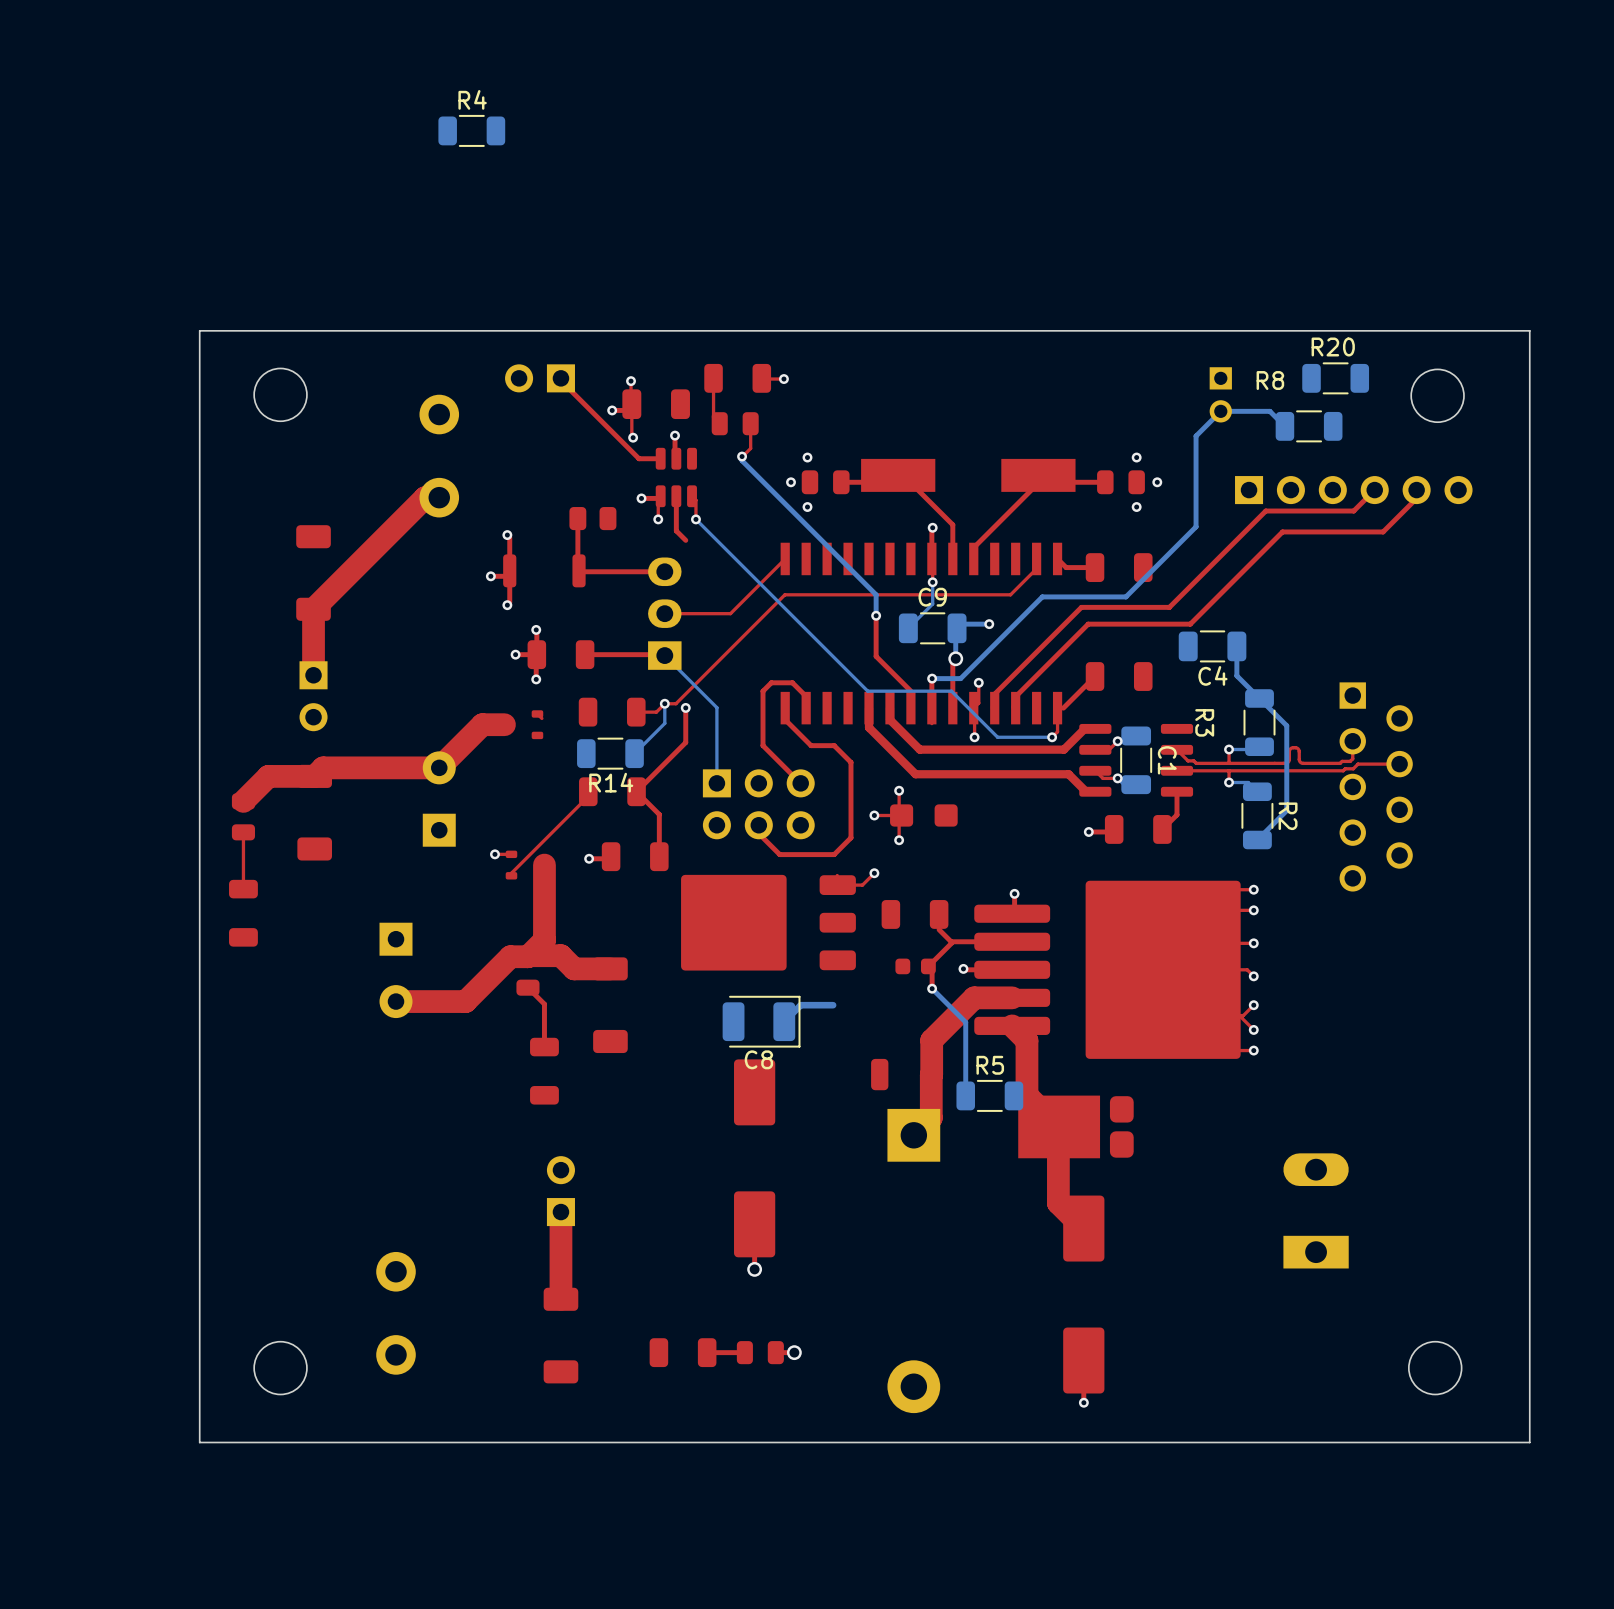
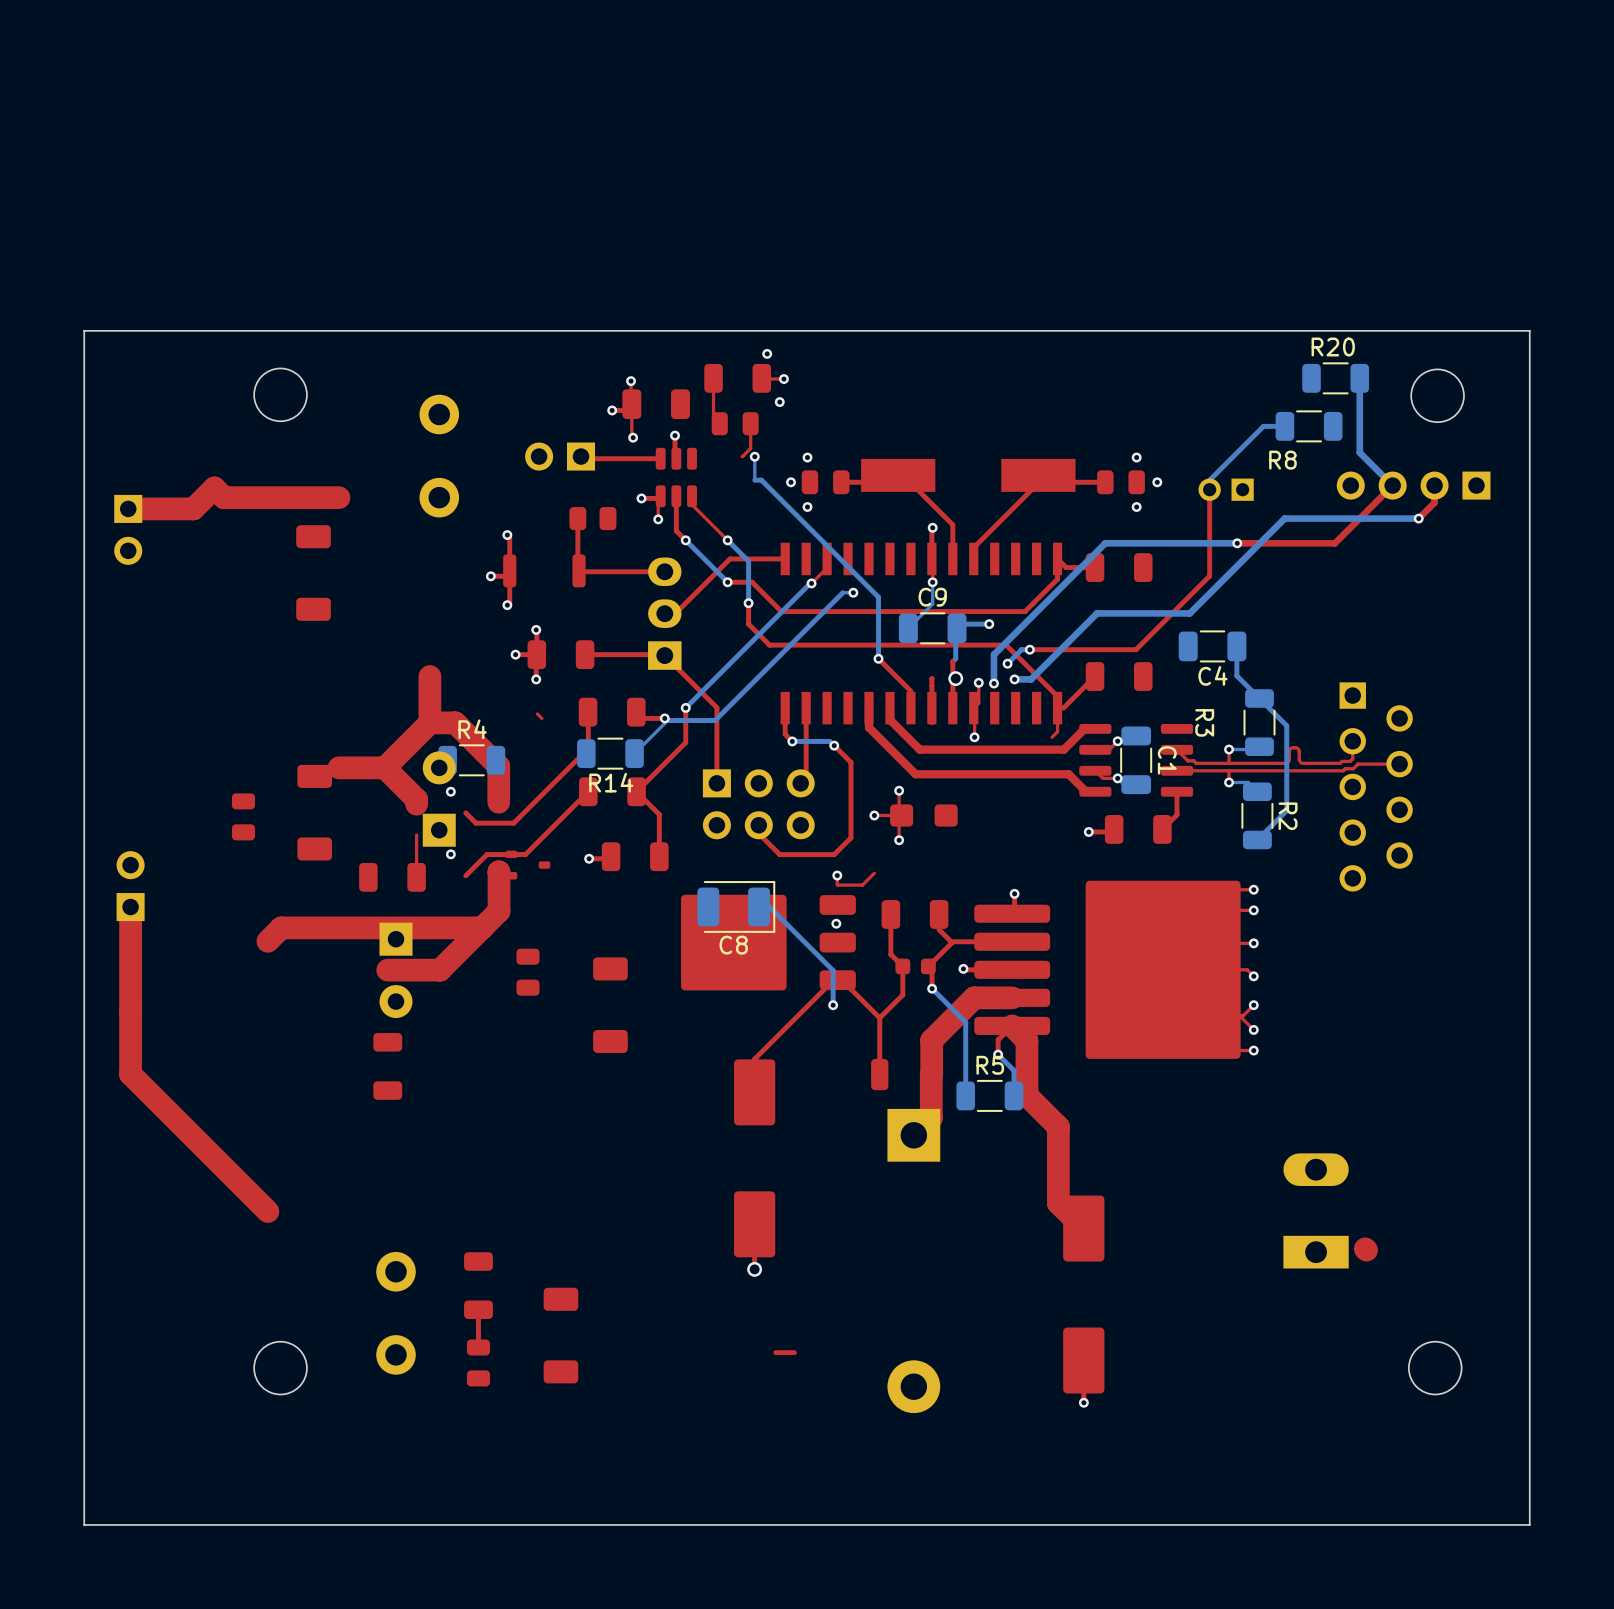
R4 position: (471, 130) -> (471, 760)
board edge: (199, 330) (199, 1442) (1529, 1442) -> (199, 330) (84, 330) (84, 1524) (1529, 1524) (1529, 1442)
via: none -> (767, 353)
part position: (540, 378) -> (560, 456)
top track: (560, 378) (560, 380) (638, 458) -> (581, 456) (583, 458) (638, 458)
bottom track: none -> (1359, 378) (1359, 452) (1392, 485)
R8 name position: R8 (1270, 380) -> R8 (1282, 460)
part rotation: 0° (1220, 394) -> 90° clockwise (1226, 489)
part position: (1220, 394) -> (1226, 489)
via: none -> (779, 402)
bottom track: (1284, 426) (1269, 411) (1220, 411) (1196, 436) (1196, 526) (1125, 596) (1042, 596) (960, 678) (932, 678) -> (1284, 426) (1263, 426) (1209, 480) (1209, 489)
bottom track: (742, 456) (742, 460) (761, 480) -> (754, 456) (754, 480) (761, 480)
via position: (742, 456) -> (754, 456)
top track: none -> (1392, 485) (1334, 543) (1237, 543)
part: none -> (1413, 485)
top track: none -> (1434, 485) (1434, 502) (1418, 518)
top track: none -> (1209, 489) (1209, 576) (1136, 649) (1029, 649)
part: (1353, 490) -> none
top track: (1374, 490) (1353, 511) (1265, 511) (1169, 607) (1081, 607) (994, 694) (993, 708) -> none
top track: (1416, 490) (1416, 498) (1383, 531) (1282, 531) (1190, 624) (1088, 624) (1015, 696) (1015, 708) -> none
top track: (692, 496) (695, 500) (695, 519) -> none
top track: none -> (338, 497) (224, 497) (214, 487) (193, 508) (128, 508)
top track: (439, 497) (425, 497) (313, 609) (313, 675) -> none
top track: none -> (692, 504) (727, 540)
bottom track: none -> (1418, 518) (1284, 518) (1189, 613) (1097, 613) (1031, 679) (1014, 679)
via: none -> (1418, 518)
bottom track: (695, 519) (867, 691) (951, 691) (997, 737) (1052, 737) -> none
via: (695, 519) -> none
part: none -> (128, 529)
bottom track: none -> (685, 540) (727, 582)
via: none -> (685, 540)
bottom track: none -> (727, 540) (748, 561) (748, 603)
via: none -> (727, 540)
bottom track: none -> (1237, 543) (1105, 543) (993, 654) (993, 683)
via: none -> (1237, 543)
top track: (785, 558) (730, 613) (664, 613) -> (785, 558) (729, 558) (664, 624)
top track: none -> (1057, 558) (1057, 579) (1025, 611) (781, 611) (752, 582) (727, 582)
top track: none -> (827, 567) (811, 583)
top track: (1036, 568) (1010, 594) (784, 594) (675, 703) (664, 703) (656, 712) (636, 712) -> none
via: none -> (727, 582)
bottom track: none -> (811, 583) (685, 707)
via: none -> (811, 583)
via: none -> (853, 592)
bottom track: (876, 594) (876, 615) -> (876, 594) (878, 597) (878, 658)
top track: none -> (748, 603) (748, 624) (769, 645) (1006, 645) (1057, 696)
via: none -> (748, 603)
top track: (876, 615) (876, 656) (878, 658) -> none
via: (876, 615) -> none
bottom track: none -> (1029, 649) (1021, 649) (1007, 663)
via: none -> (1029, 649)
top track: none -> (664, 655) (716, 707) (716, 783)
bottom track: (664, 655) (716, 707) (716, 783) -> none
via: none -> (878, 658)
via position: (955, 658) -> (955, 678)
via: none -> (1007, 663)
top track: none -> (429, 676) (429, 722)
via: (932, 678) -> none
via: none -> (1014, 679)
via: none -> (993, 683)
part: (313, 696) -> none
bottom track: (664, 703) (664, 718) -> (853, 592) (842, 592) (715, 720) (666, 720) (664, 718)
via position: (664, 703) -> (664, 718)
top track: (806, 708) (806, 696) (792, 682) (771, 682) (763, 691) (763, 745) (800, 783) -> (806, 708) (806, 777)
top track: none -> (588, 718) (588, 748) (513, 823) (476, 823) (465, 812)
top track: none -> (664, 718) (636, 718)
top track: (785, 719) (811, 745) (834, 745) -> (785, 719) (785, 734) (792, 741)
top track: none -> (429, 722) (384, 767) (416, 799) (416, 804)
top track: none -> (429, 722) (455, 722) (498, 766) (498, 802)
top track: (504, 724) (482, 724) (439, 767) (384, 767) -> none
part: (520, 724) -> none
via: (1052, 737) -> none
bottom track: none -> (792, 741) (830, 741) (834, 745)
via: none -> (792, 741)
via: none -> (834, 745)
top track: (338, 767) (323, 767) (314, 776) (268, 776) (243, 801) -> none
via: none -> (450, 791)
top track: (588, 791) (588, 796) (511, 873) (511, 875) -> (588, 791) (525, 854) (486, 854) (465, 875)
top track: (243, 832) (243, 889) -> none
top track: none -> (416, 835) (416, 877)
via: none -> (450, 854)
via: (494, 854) -> none
top track: (544, 865) (544, 940) (527, 956) (510, 956) (465, 1001) (396, 1001) -> none
top track: none -> (498, 871) (499, 911) (440, 970) (387, 970)
via: (874, 873) -> none
via: none -> (837, 875)
part: none -> (392, 877)
part: none -> (130, 886)
top track: none -> (130, 907) (130, 1074) (267, 1211)
part: (243, 913) -> none
top track: none -> (890, 914) (890, 954) (902, 966) (902, 994) (879, 1017)
part position: (768, 922) -> (768, 942)
via: none -> (836, 923)
top track: none -> (482, 927) (281, 927) (267, 941)
top track: (529, 955) (560, 955) (574, 968) (610, 968) -> none
top track: (527, 987) (544, 1004) (544, 1047) -> none
bottom track: (833, 1005) (800, 1005) (784, 1021) -> (833, 1005) (833, 970) (765, 902)
via: none -> (833, 1005)
top track: none -> (879, 1017) (879, 1074)
top track: none -> (879, 1017) (841, 980) (833, 980) (754, 1059) (754, 1092)
C8 position: (761, 1021) -> (736, 906)
top track: none -> (1012, 1025) (998, 1040) (998, 1054)
bottom track: none -> (998, 1054) (1013, 1070) (1013, 1095)
via: none -> (998, 1054)
part: none -> (387, 1066)
part: (544, 1071) -> none
part: (1075, 1126) -> none
part: (560, 1191) -> none
top track: (560, 1212) (560, 1299) -> none
top track: none -> (1365, 1248) (1366, 1250)
part: none -> (478, 1285)
top track: none -> (478, 1309) (478, 1347)
part: (683, 1352) -> none
top track: (744, 1352) (707, 1352) -> none
part rotation: 0° (760, 1352) -> 90° clockwise (478, 1362)
part position: (760, 1352) -> (478, 1362)
via: (794, 1352) -> none

